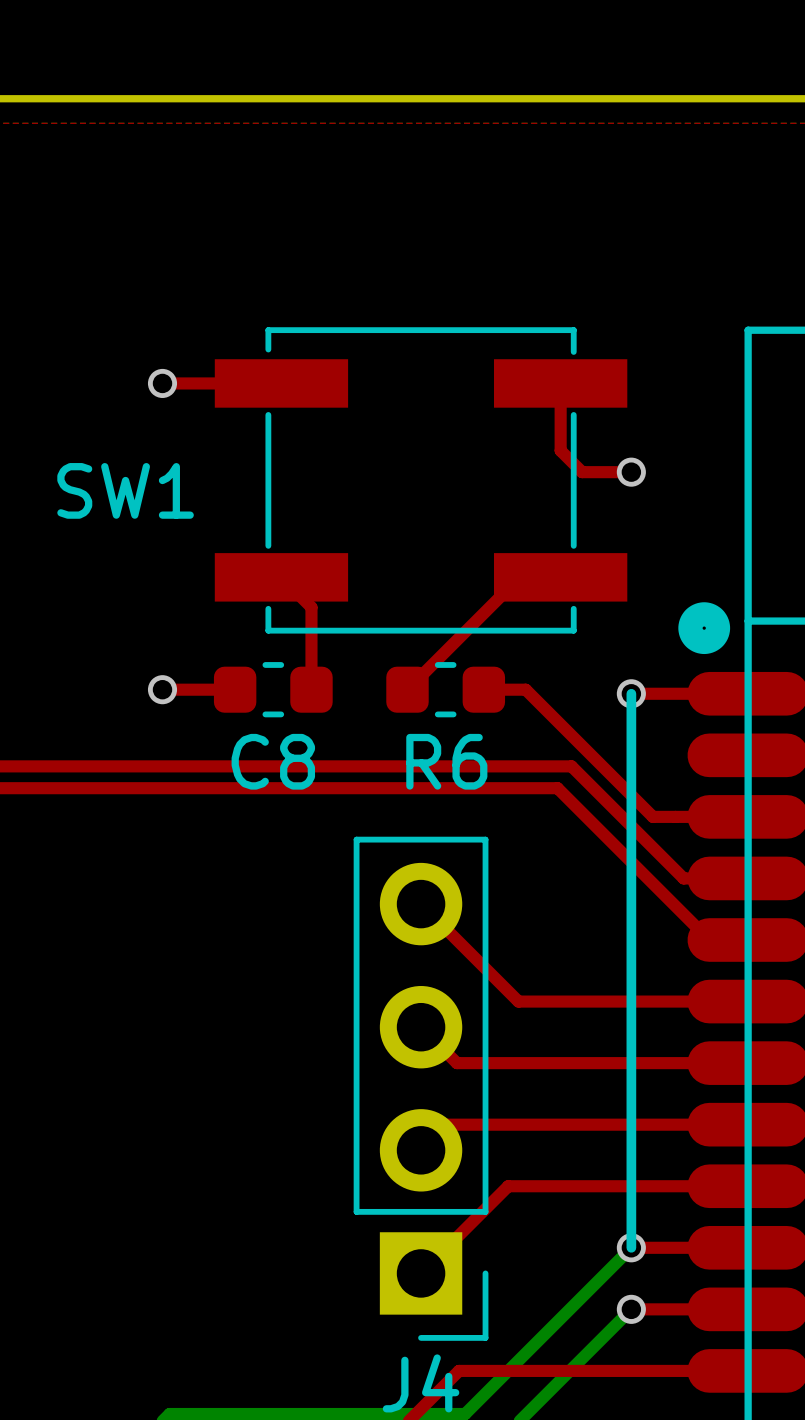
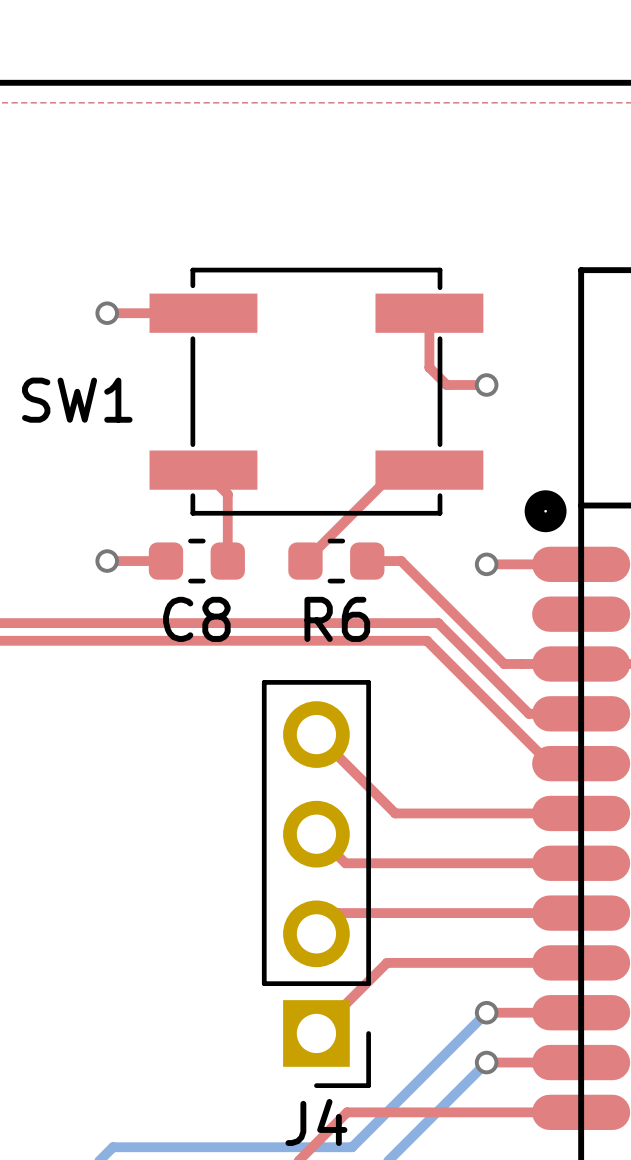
line: (631, 693) (631, 1247) -> none

